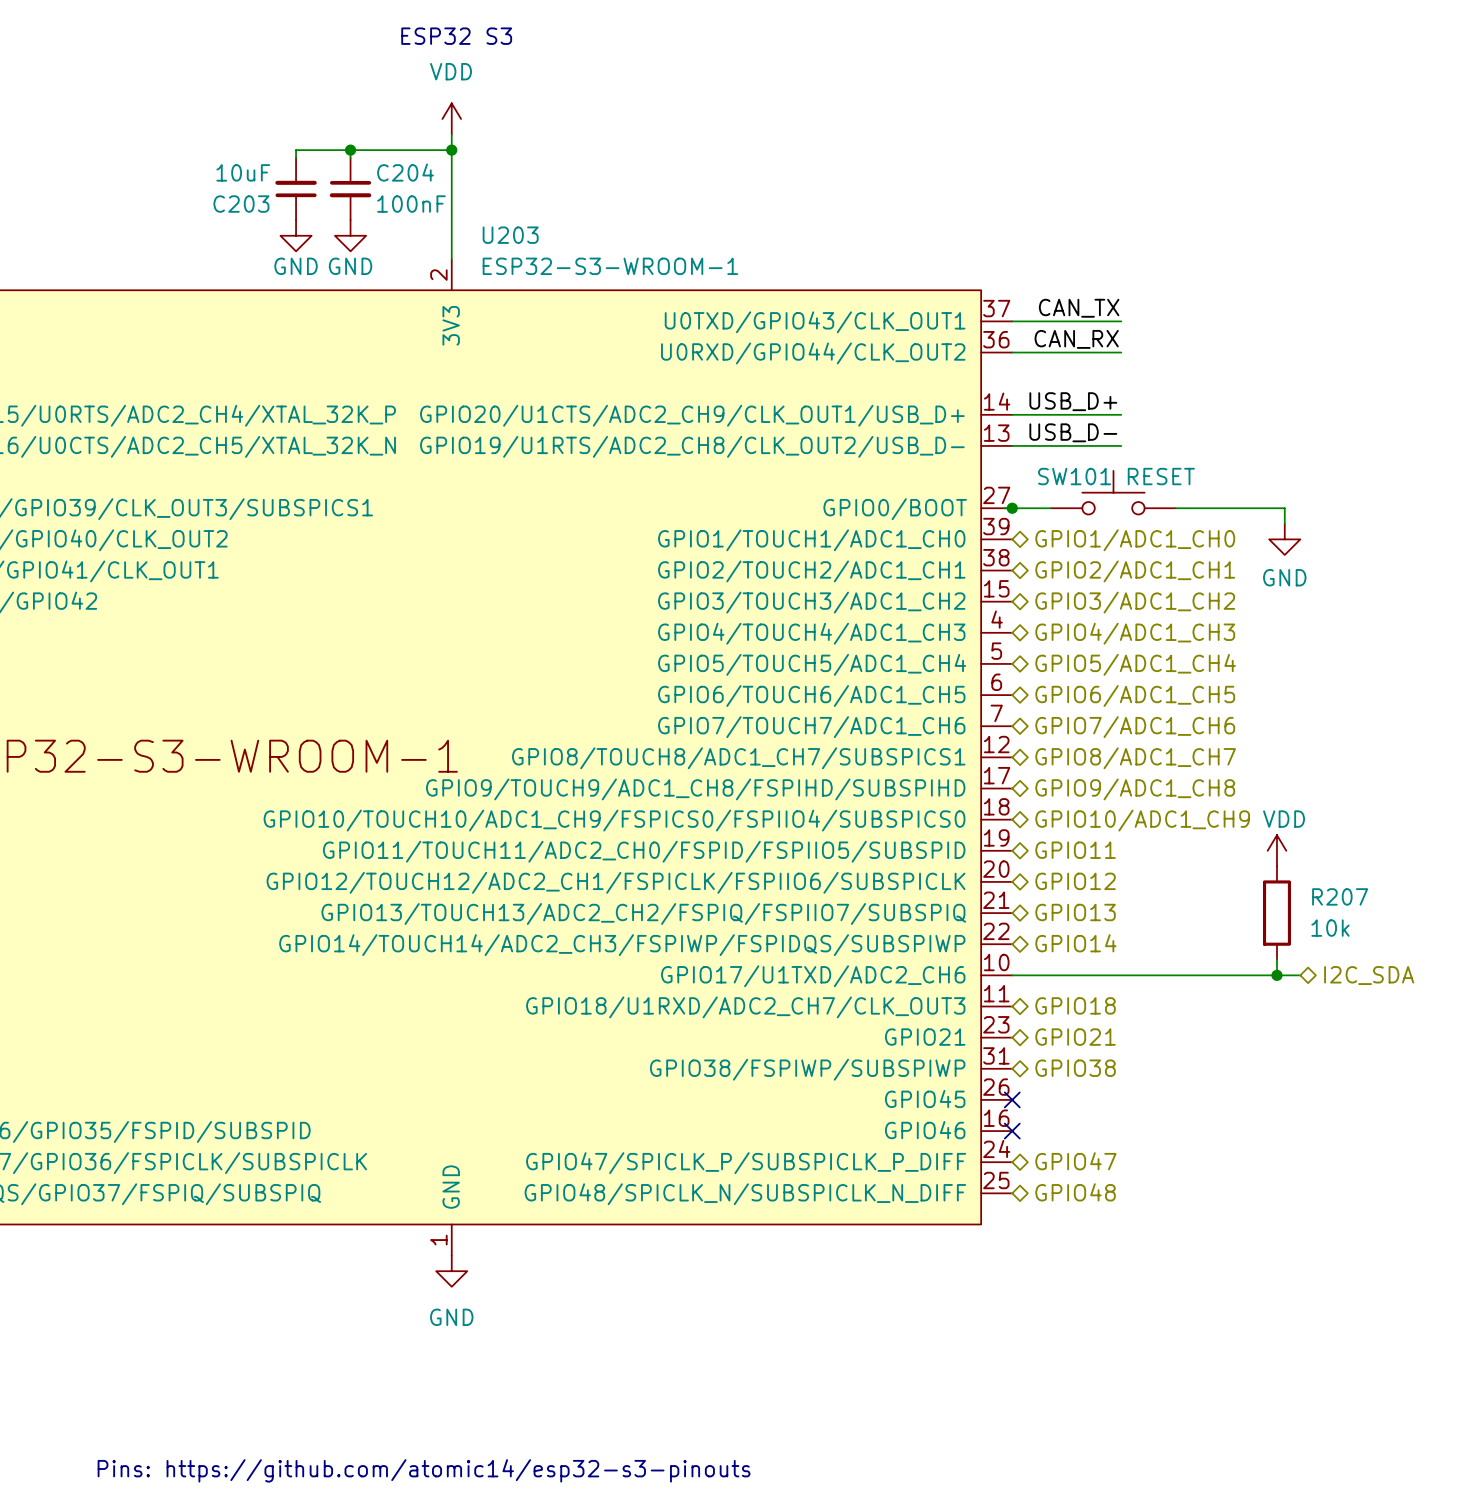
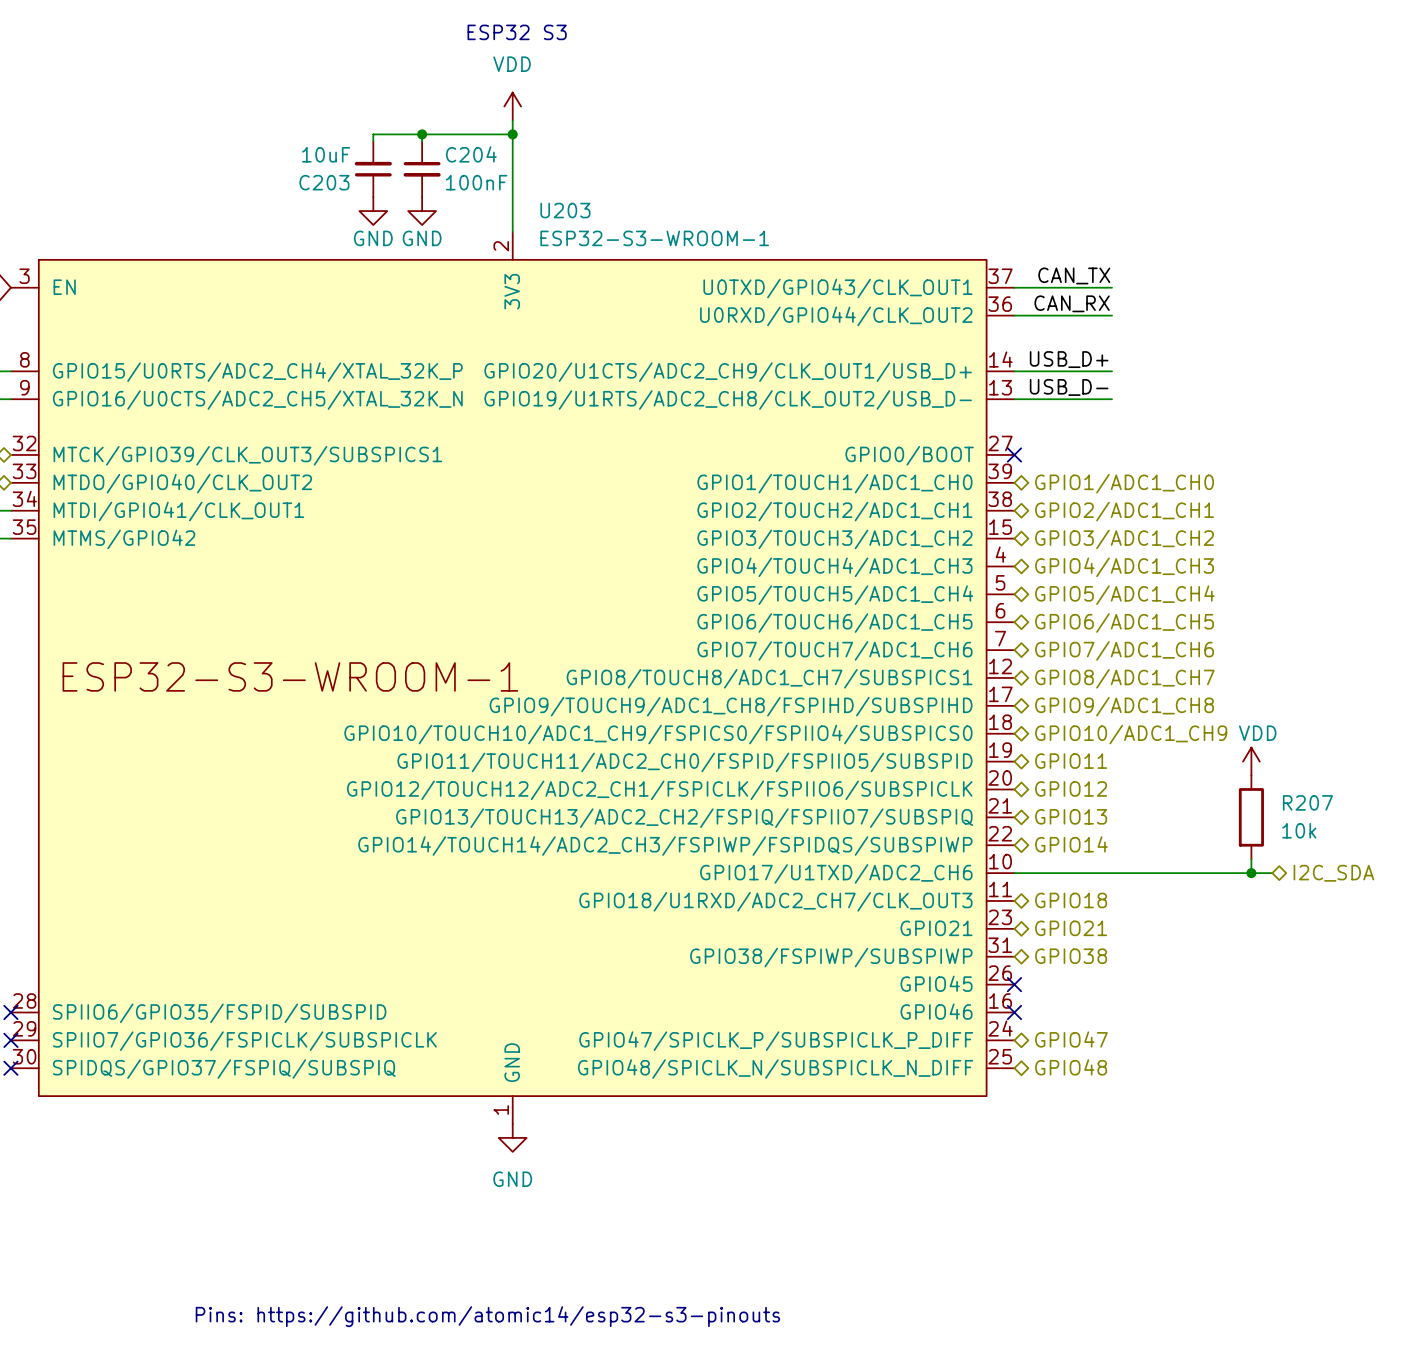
SW101: RESET (1113, 492) -> none
wire: (1004, 508) (1051, 508) -> none
junction: (1012, 508) -> none
no-connect mark: none -> (1014, 454)
wire: (1175, 508) (1284, 508) (1284, 523) -> none
power symbol: GND (1284, 539) -> none

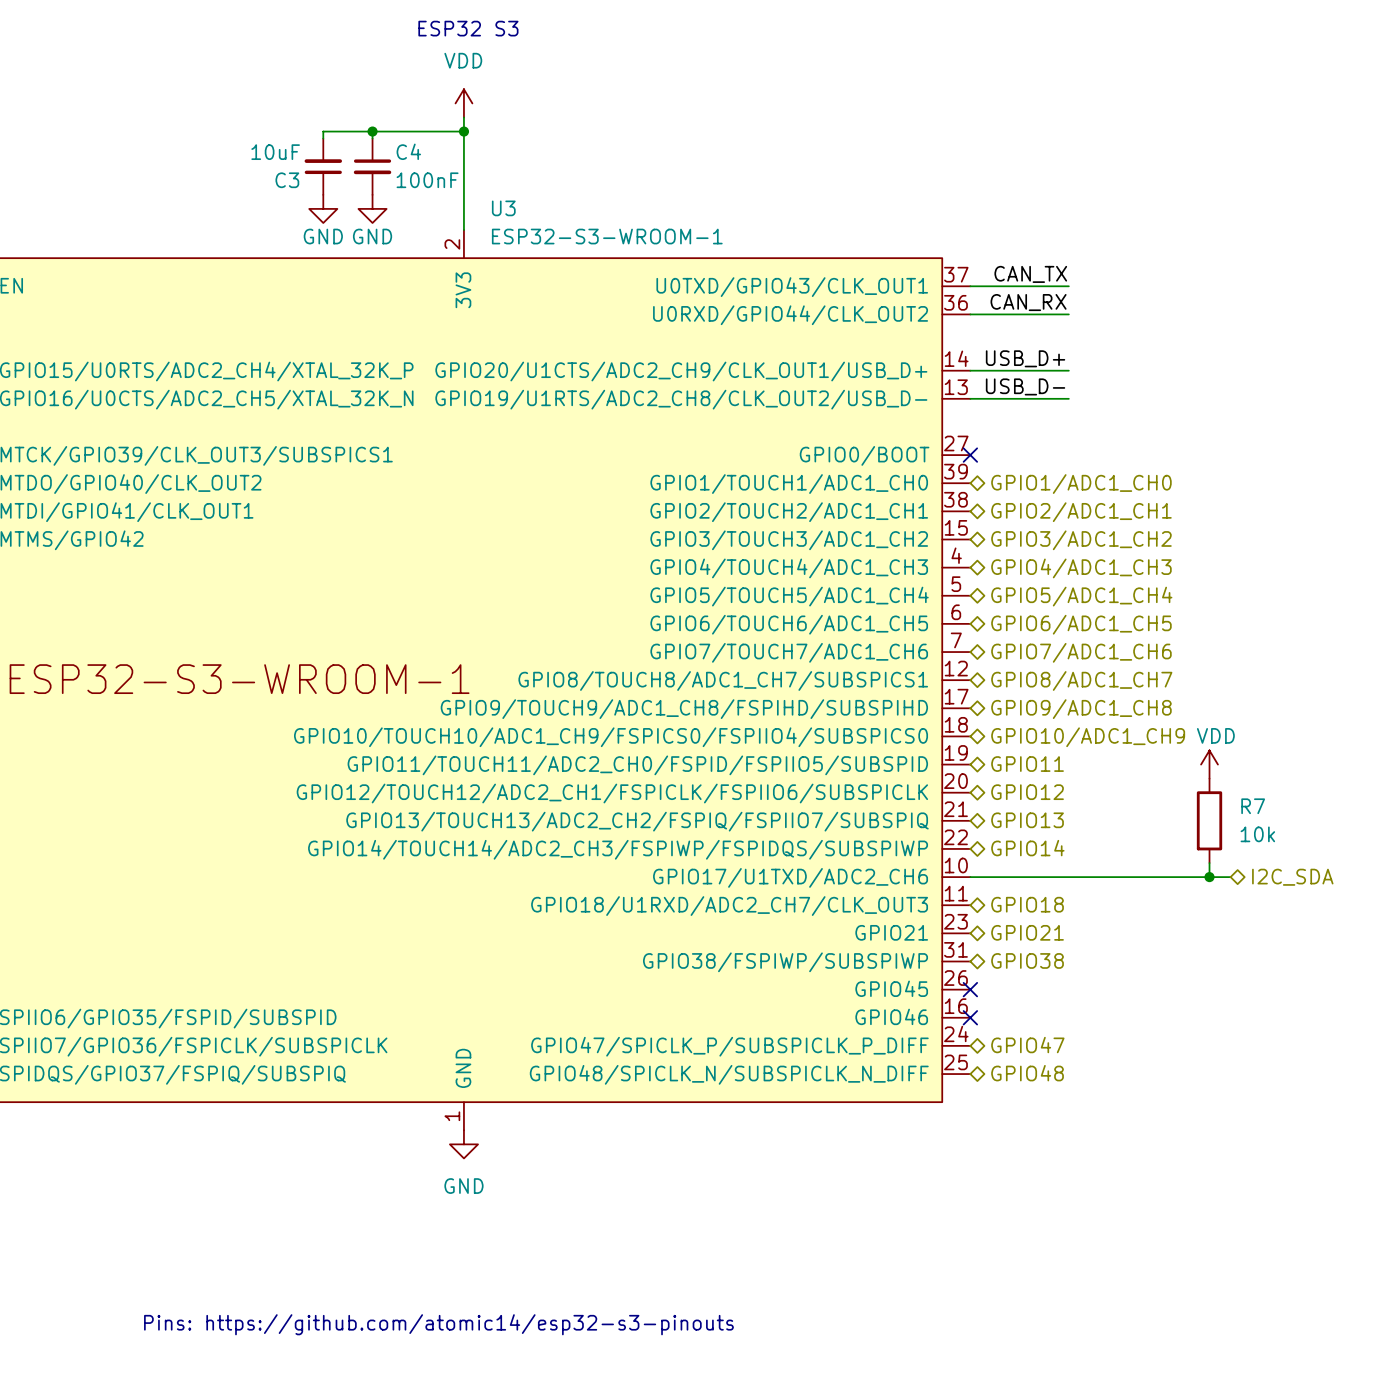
C204 name: C204 (471, 154) -> C4 (408, 151)
C203 name: C203 (324, 182) -> C3 (287, 180)
U203 name: U203 (565, 210) -> U3 (503, 208)
R207 name: R207 (1307, 802) -> R7 (1253, 806)

